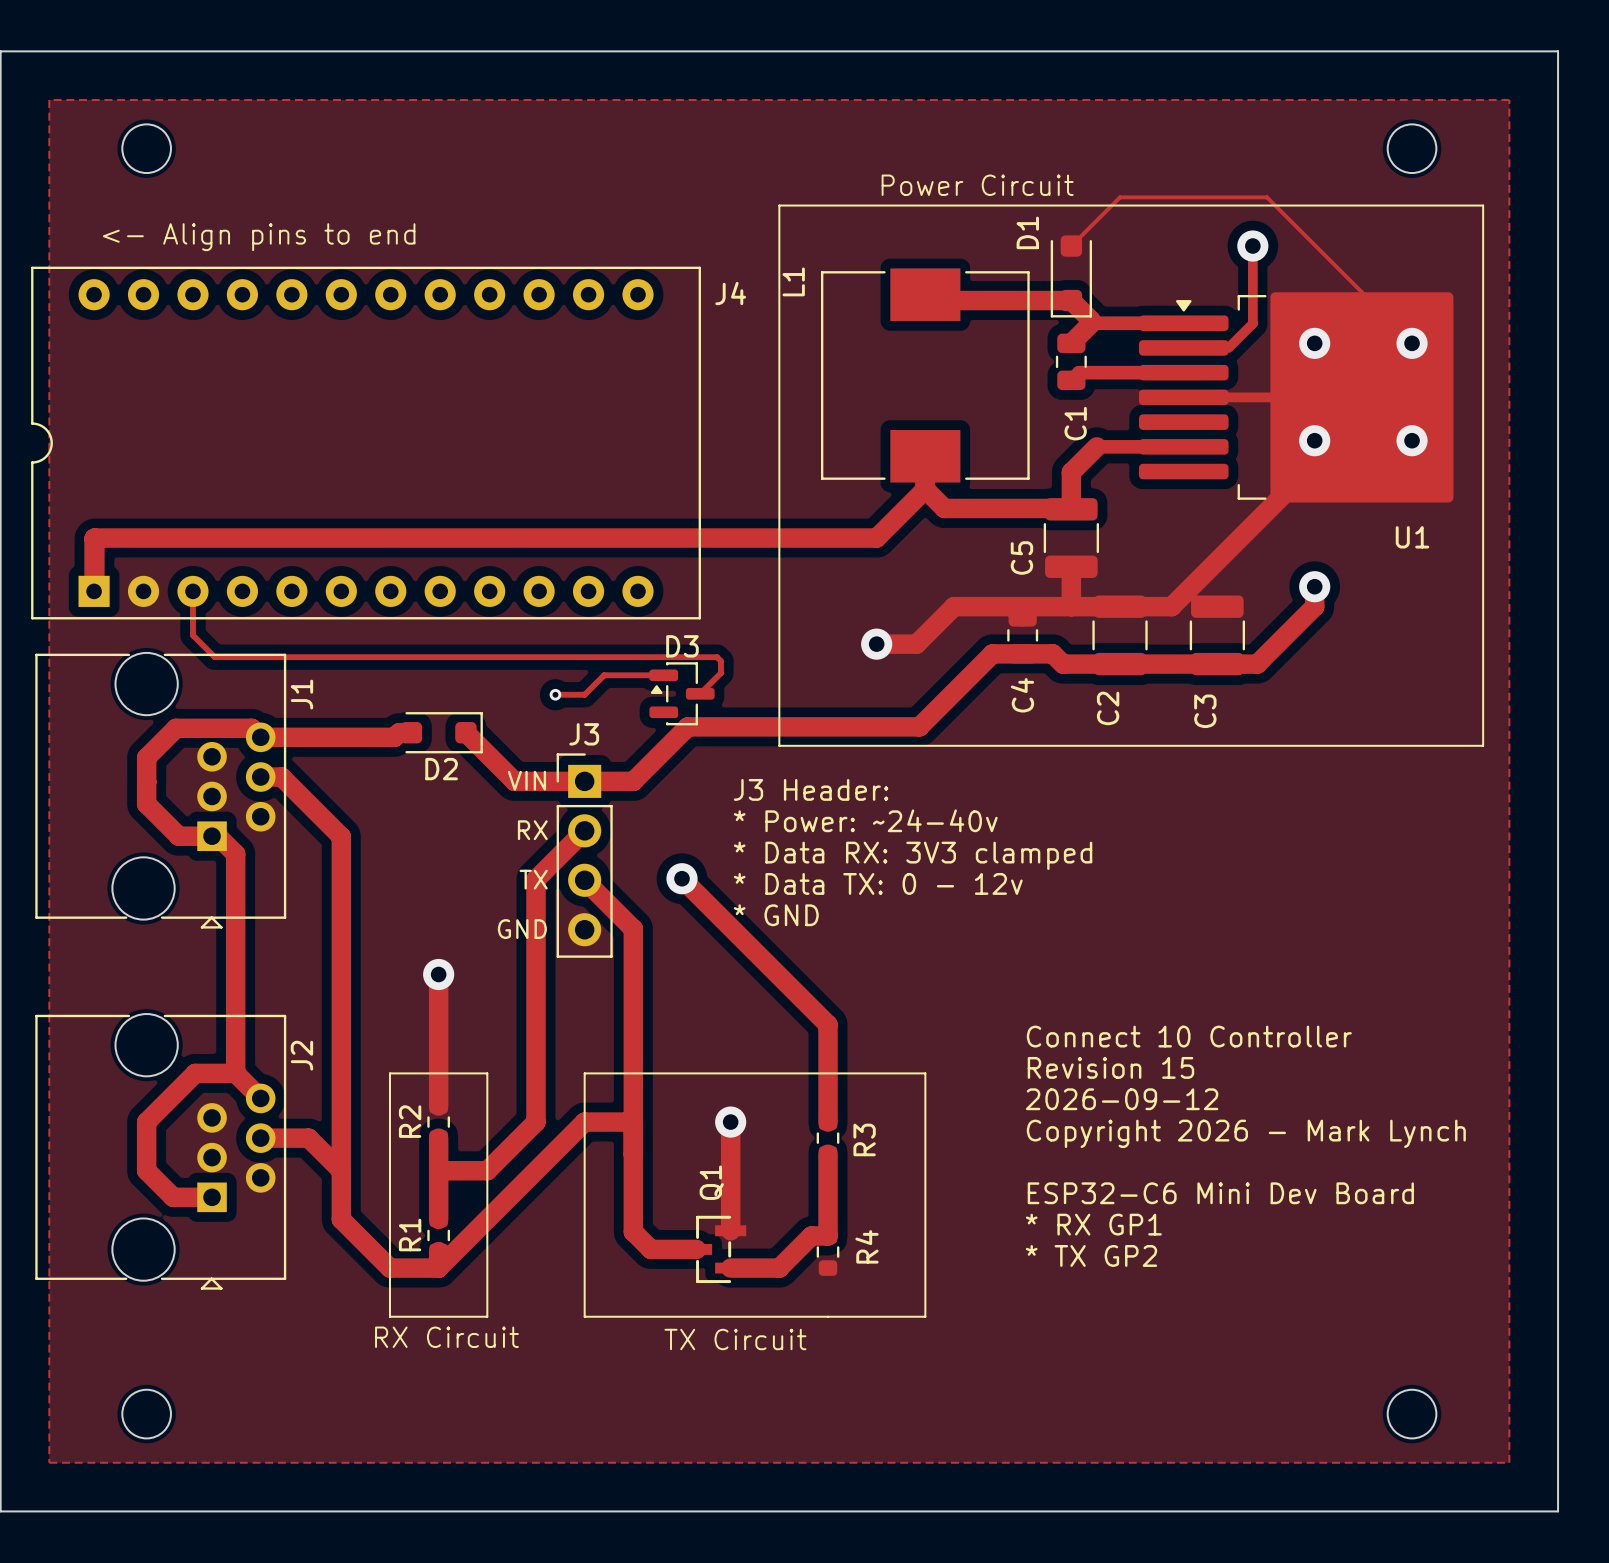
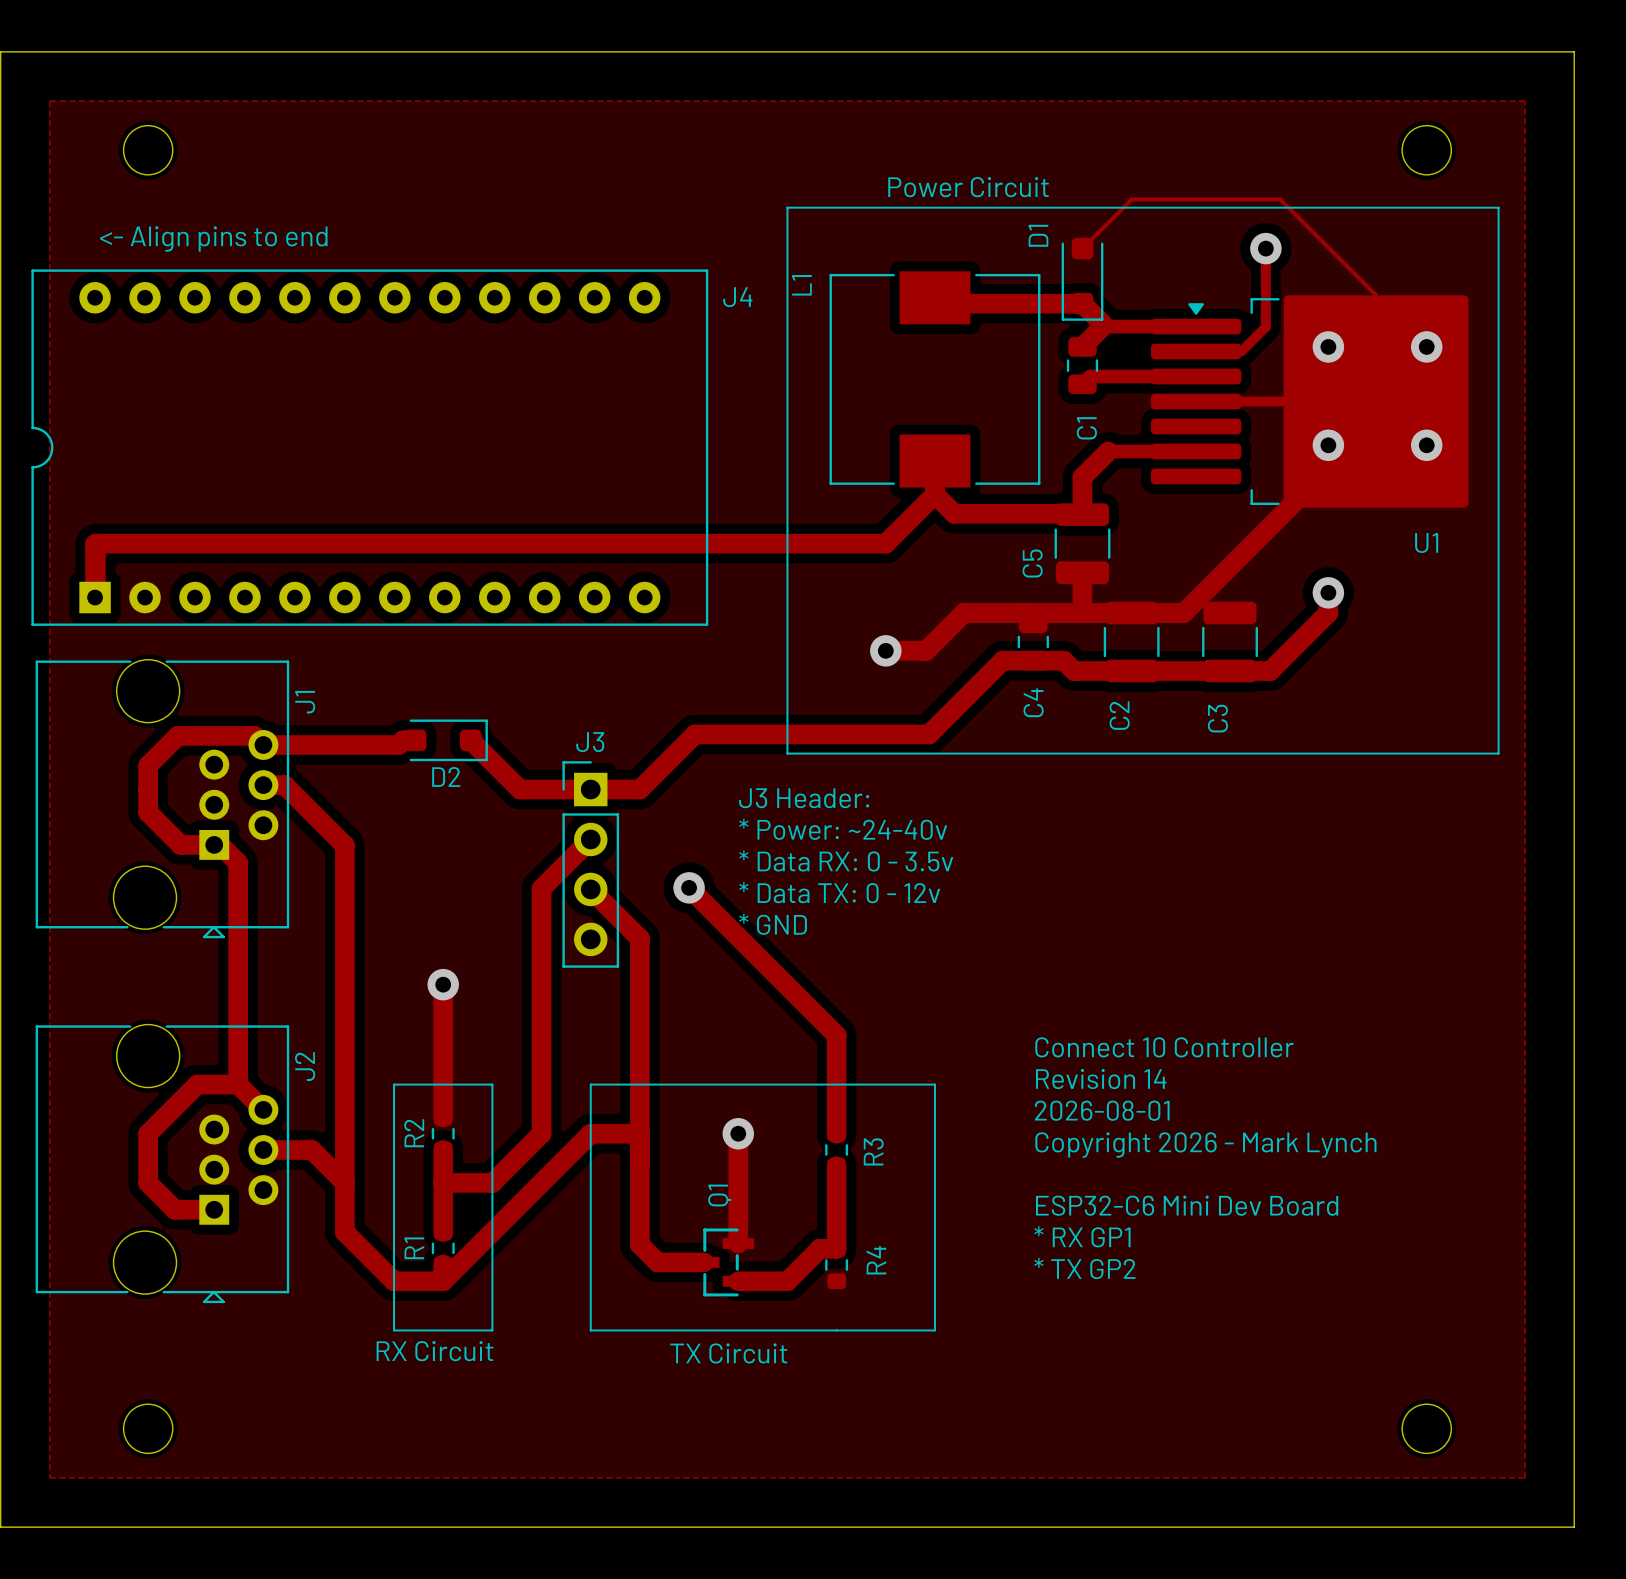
track: (192, 591) (192, 635) (214, 657) (717, 657) (720, 661) (720, 673) (700, 693) -> none
track: (663, 675) (604, 675) (584, 694) (555, 694) -> none
D3: (682, 693) -> none
via: (555, 694) -> none
text: VIN (526, 780) -> none
text: RX (532, 830) -> none
text: * Data RX: 3V3 clamped (913, 855) -> * Data RX: 0 - 3.5v (846, 860)
text: TX (533, 879) -> none
text: GND (522, 929) -> none
text: Revision 15 (1110, 1067) -> Revision 14 (1101, 1079)
text: 2026-09-12 (1122, 1099) -> 2026-08-01 (1102, 1110)

